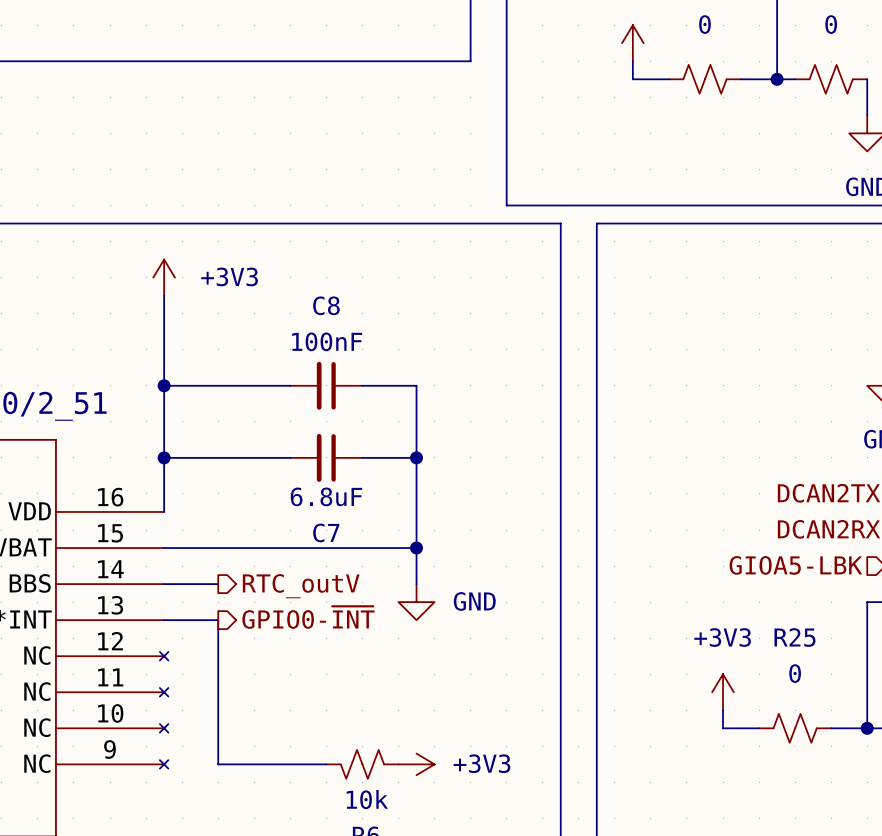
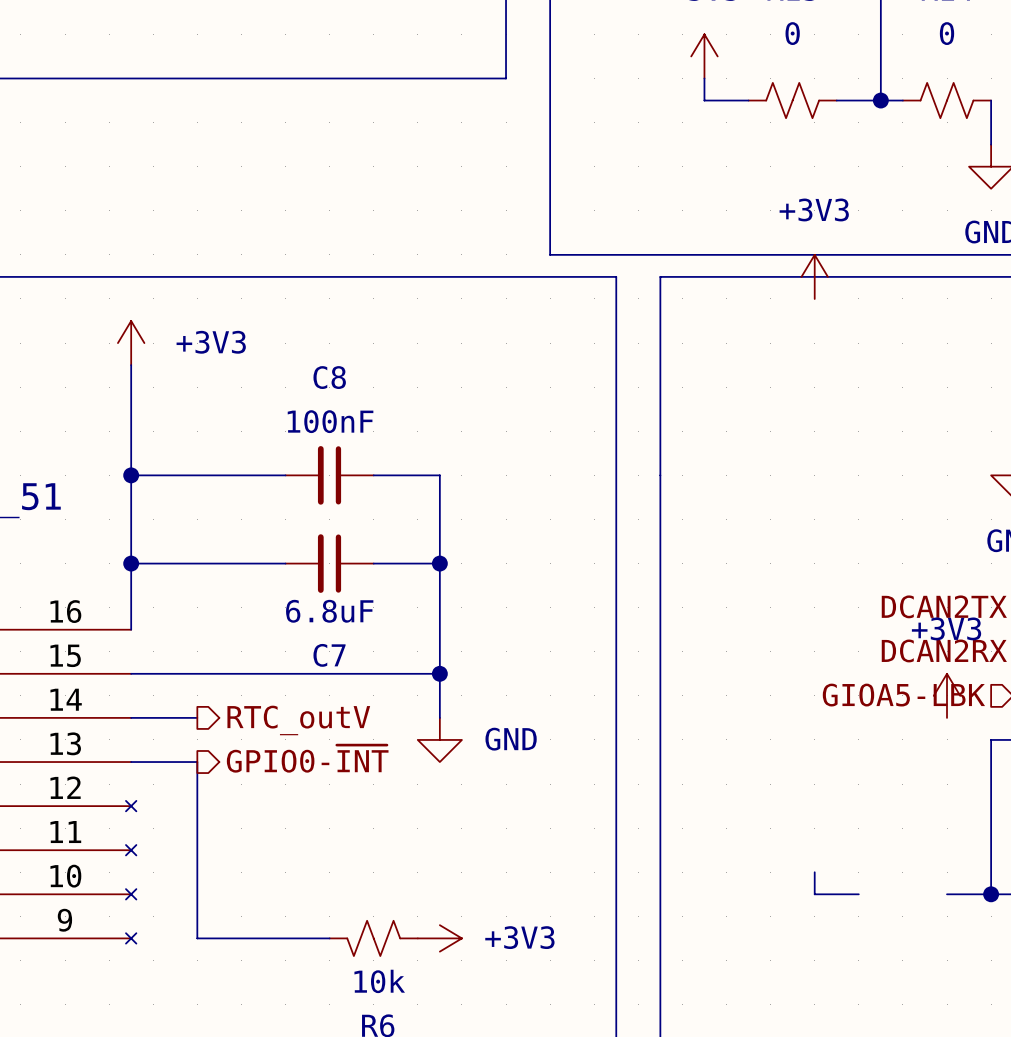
power symbol: none -> +3V3 (814, 276)
power symbol position: +3V3 (723, 692) -> +3V3 (947, 695)
R25: 0 (795, 728) -> none

